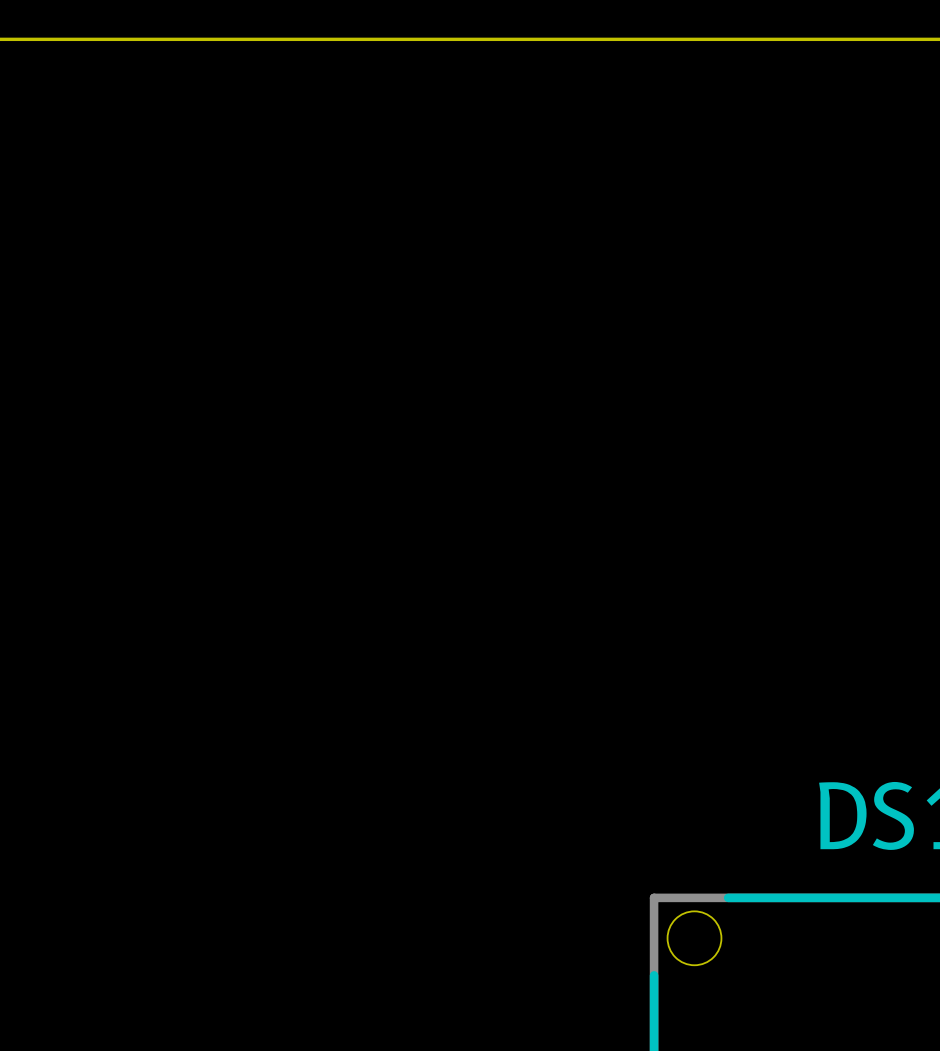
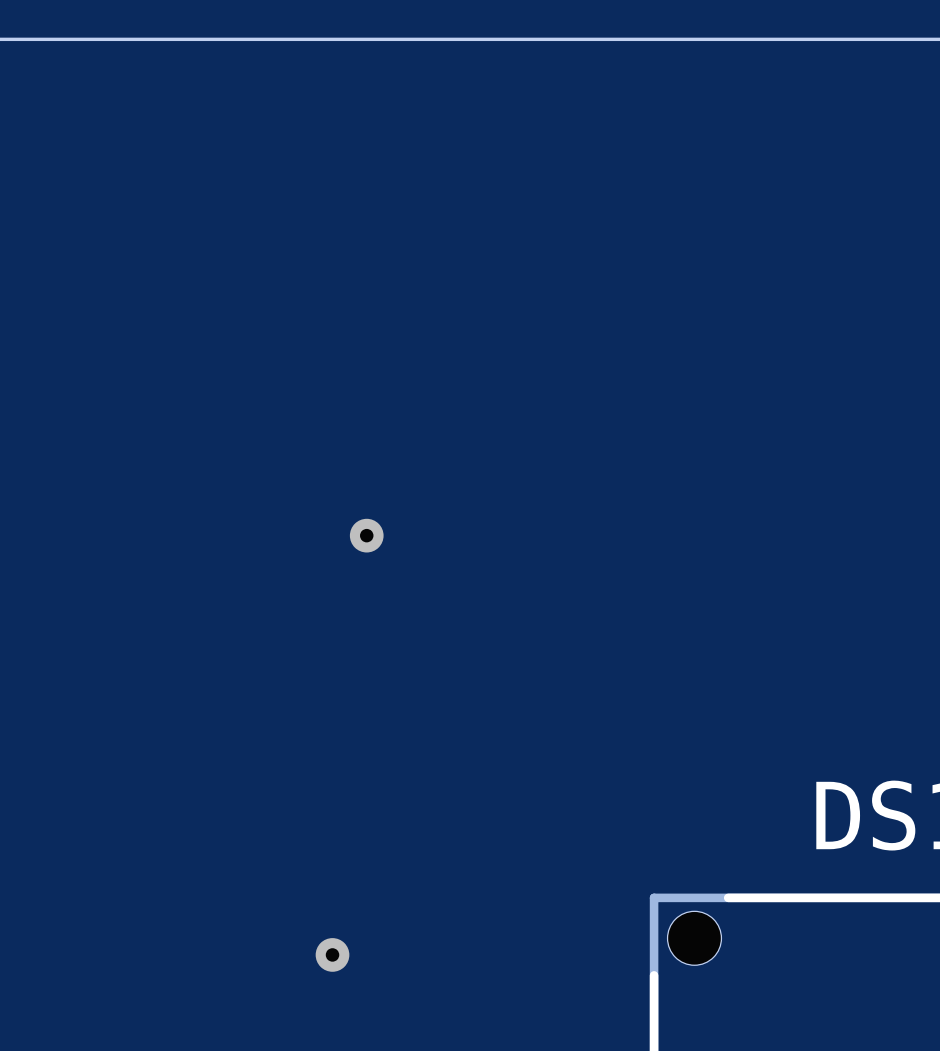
via: none -> (366, 535)
via: none -> (332, 954)

